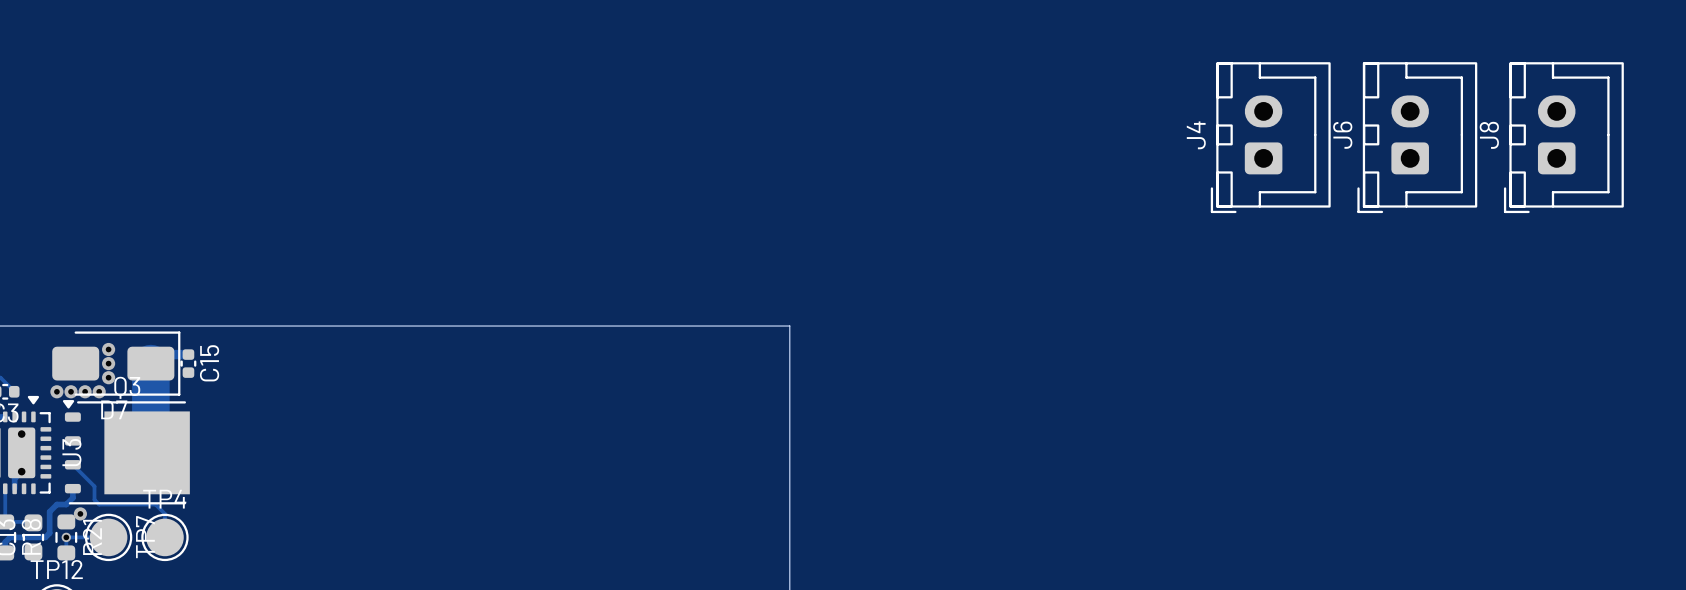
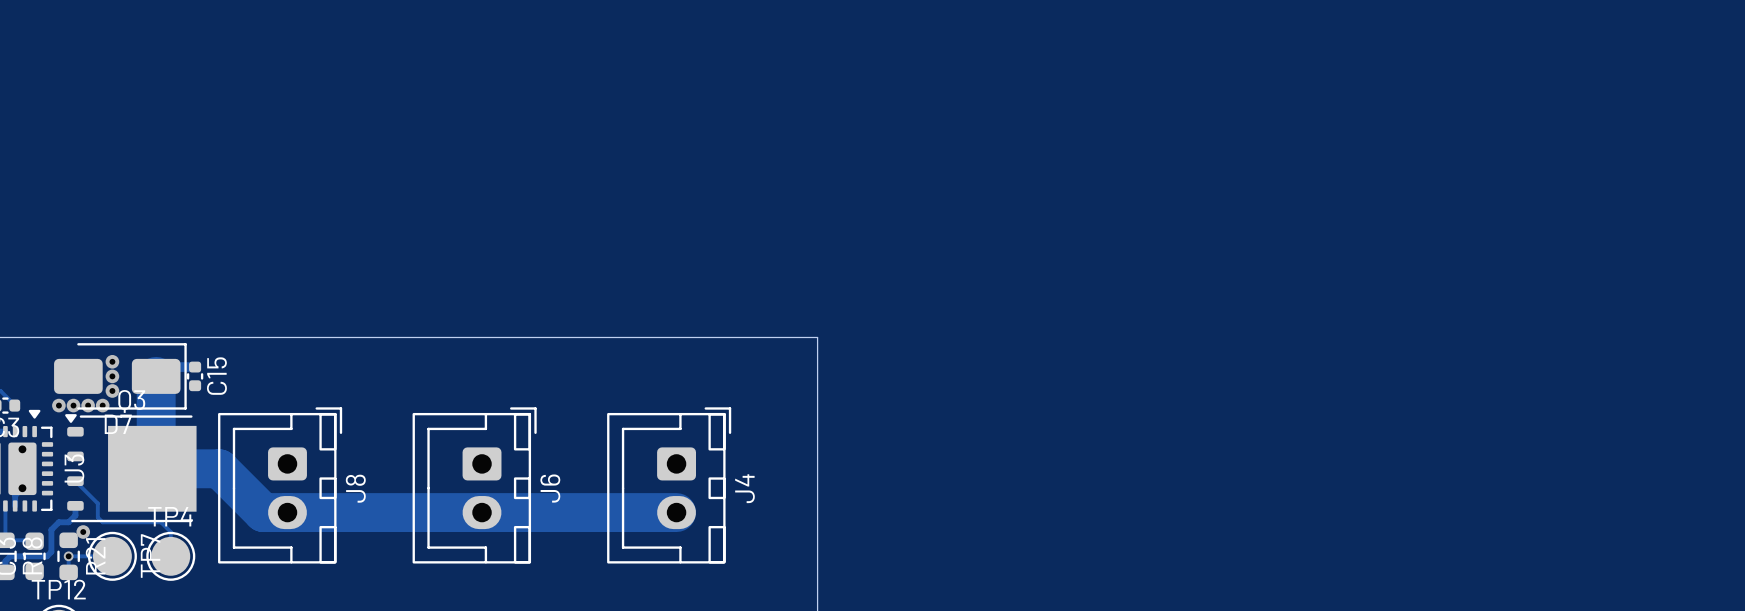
J4 rotation: 0° (1270, 137) -> 180° (669, 485)
J4 position: (1270, 137) -> (669, 485)
J6 rotation: 0° (1417, 137) -> 180° (474, 485)
J6 position: (1417, 137) -> (474, 485)
J8 rotation: 0° (1563, 137) -> 180° (280, 485)
J8 position: (1563, 137) -> (280, 485)
track: none -> (152, 468) (219, 468) (263, 512) (676, 512)

